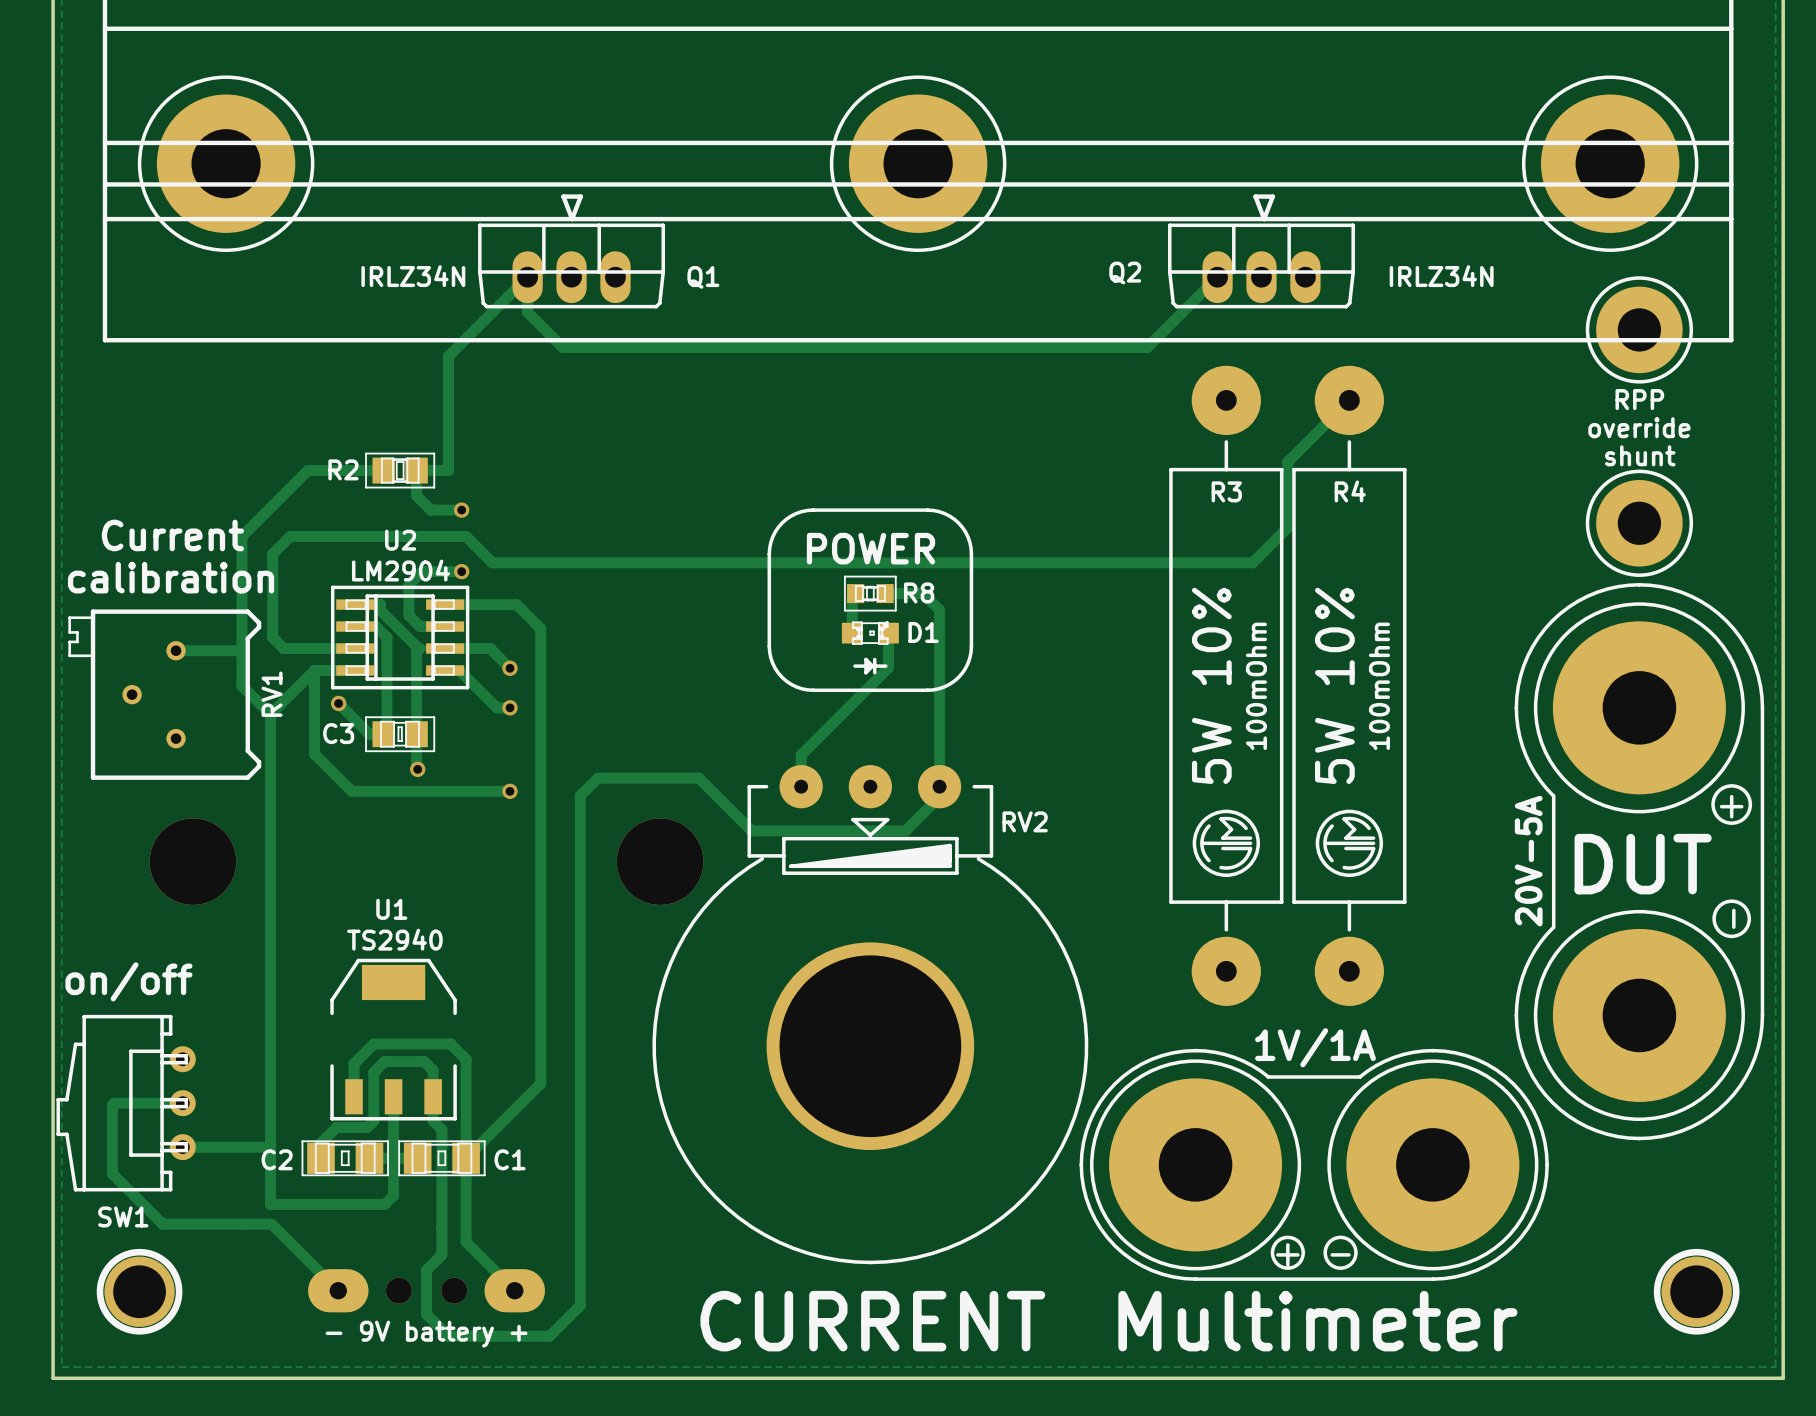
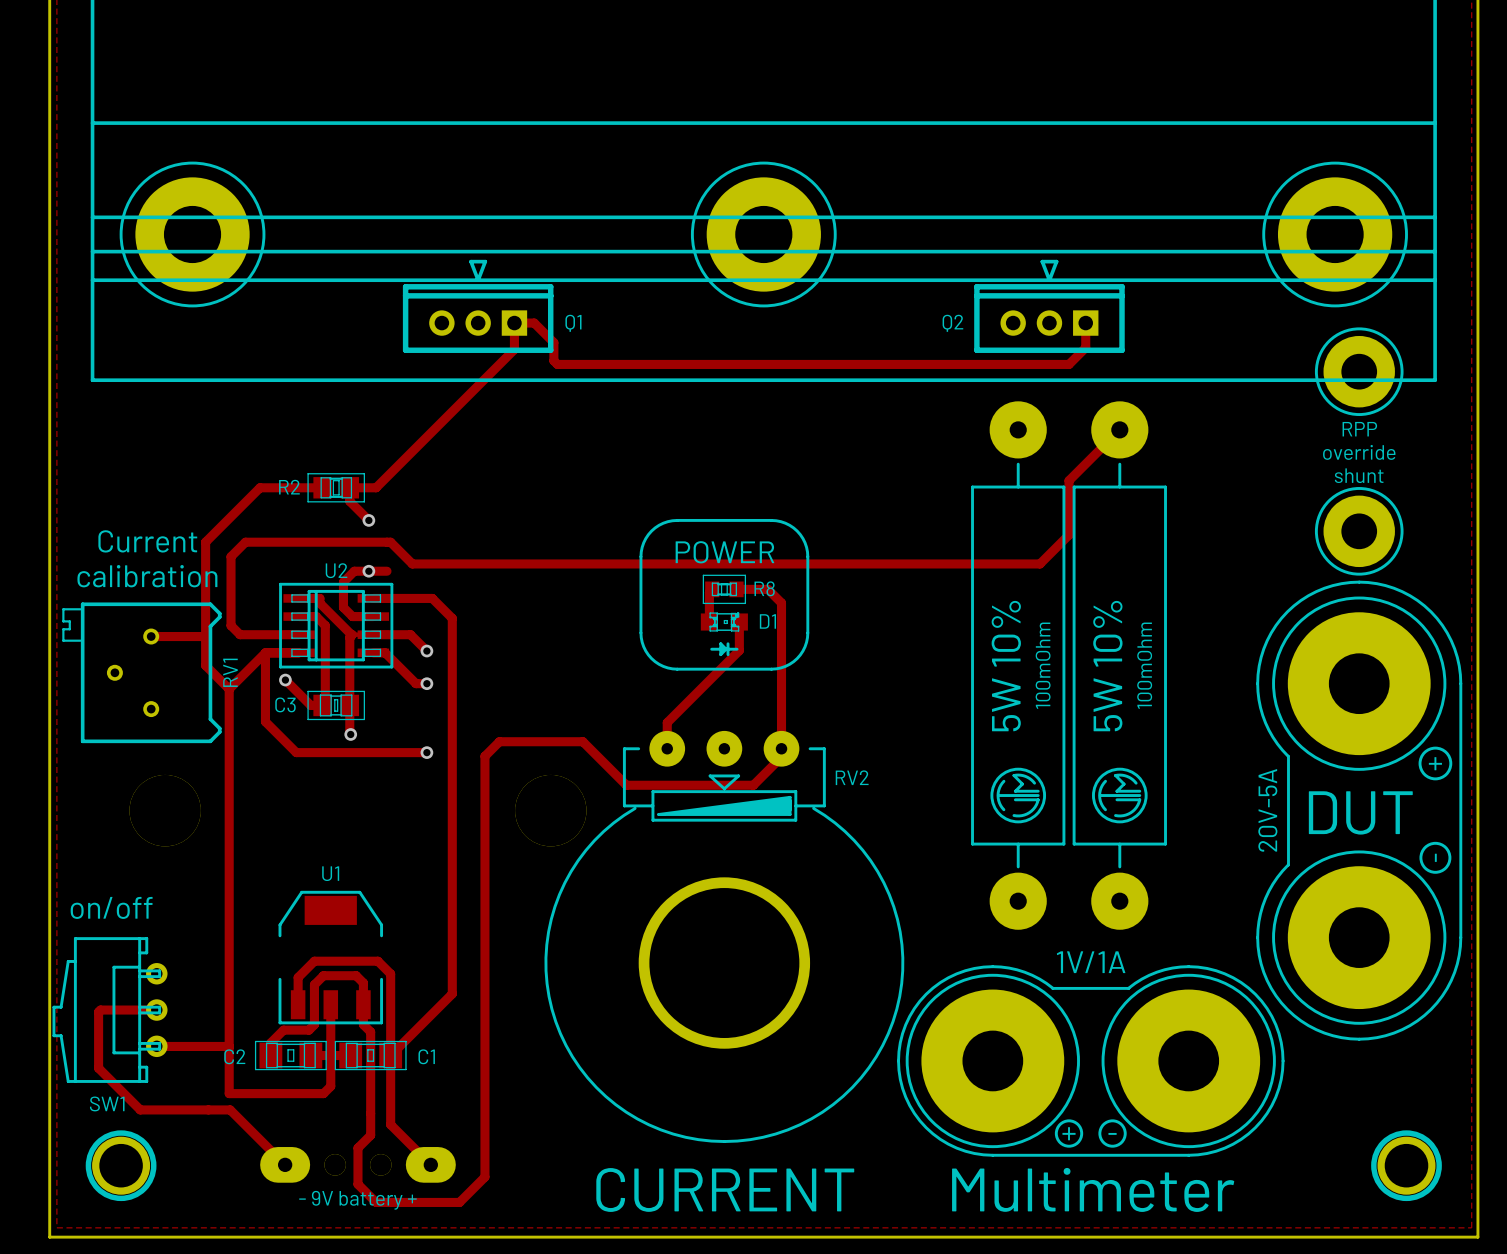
Q1 footprint: [478, 223, 666, 309] -> [402, 284, 554, 353]
Q2 footprint: [1168, 223, 1355, 309] -> [974, 284, 1125, 353]
Q1 value: IRLZ34N (413, 276) -> none
Q2 value: IRLZ34N (1441, 276) -> none
track: (1217, 277) (1147, 347) (562, 347) (527, 312) (527, 277) (448, 356) (448, 470) -> (1085, 323) (1085, 347) (1069, 364) (557, 364) (553, 360) (553, 342) (534, 323) (514, 323) (514, 349) (376, 487)
track: (416, 486) (416, 495) (430, 510) (461, 510) -> (349, 501) (368, 520)
R3 name: R3 (1226, 491) -> none
R4 name: R4 (1350, 491) -> none
via position: (461, 510) -> (368, 520)
U2 name position: U2 (400, 540) -> U2 (336, 570)
U2 value: LM2904 (400, 570) -> none
via position: (461, 571) -> (368, 571)
U1 name position: U1 (391, 909) -> U1 (330, 873)
U1 value: TS2940 (394, 939) -> none

